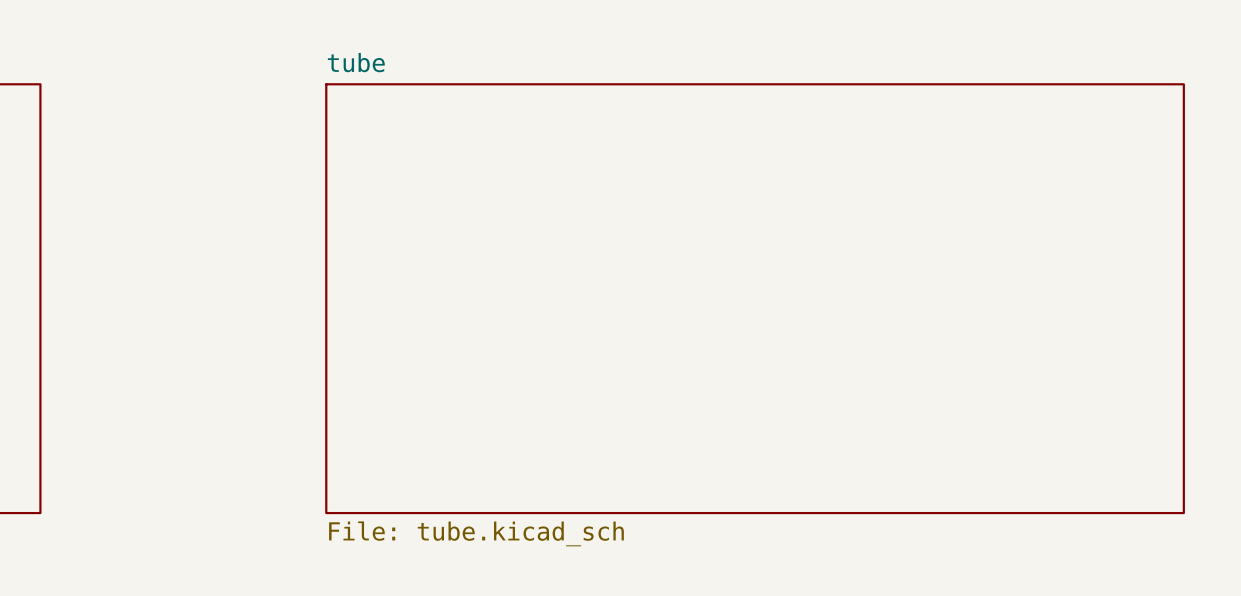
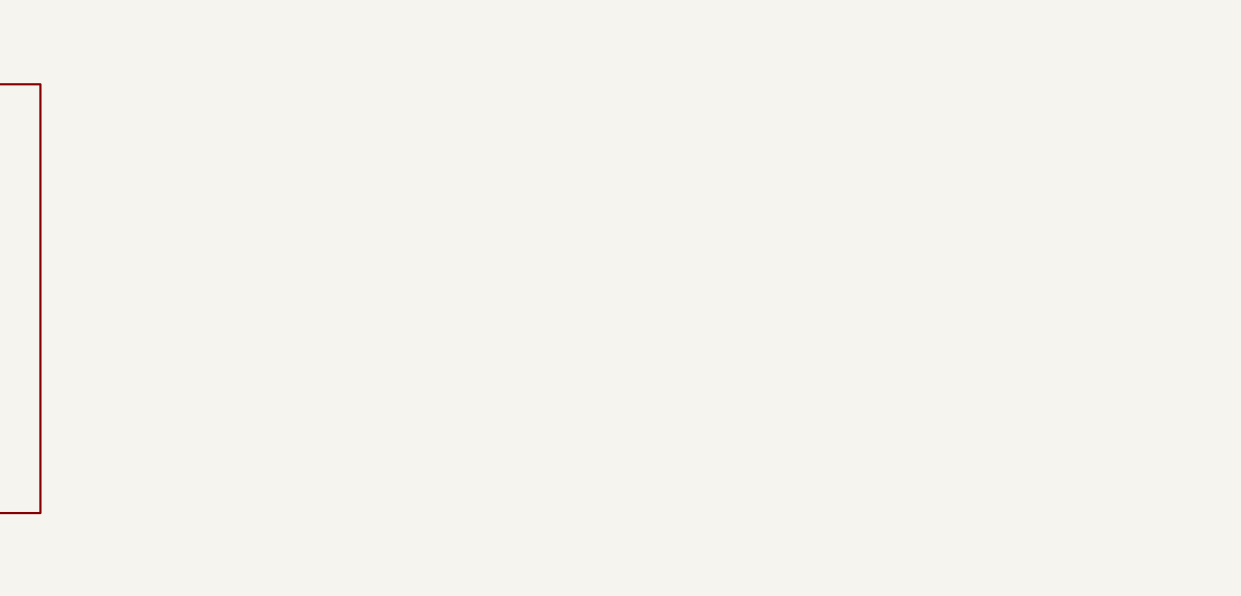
sheet tube: File: tube.kicad_sch (755, 298) -> none

